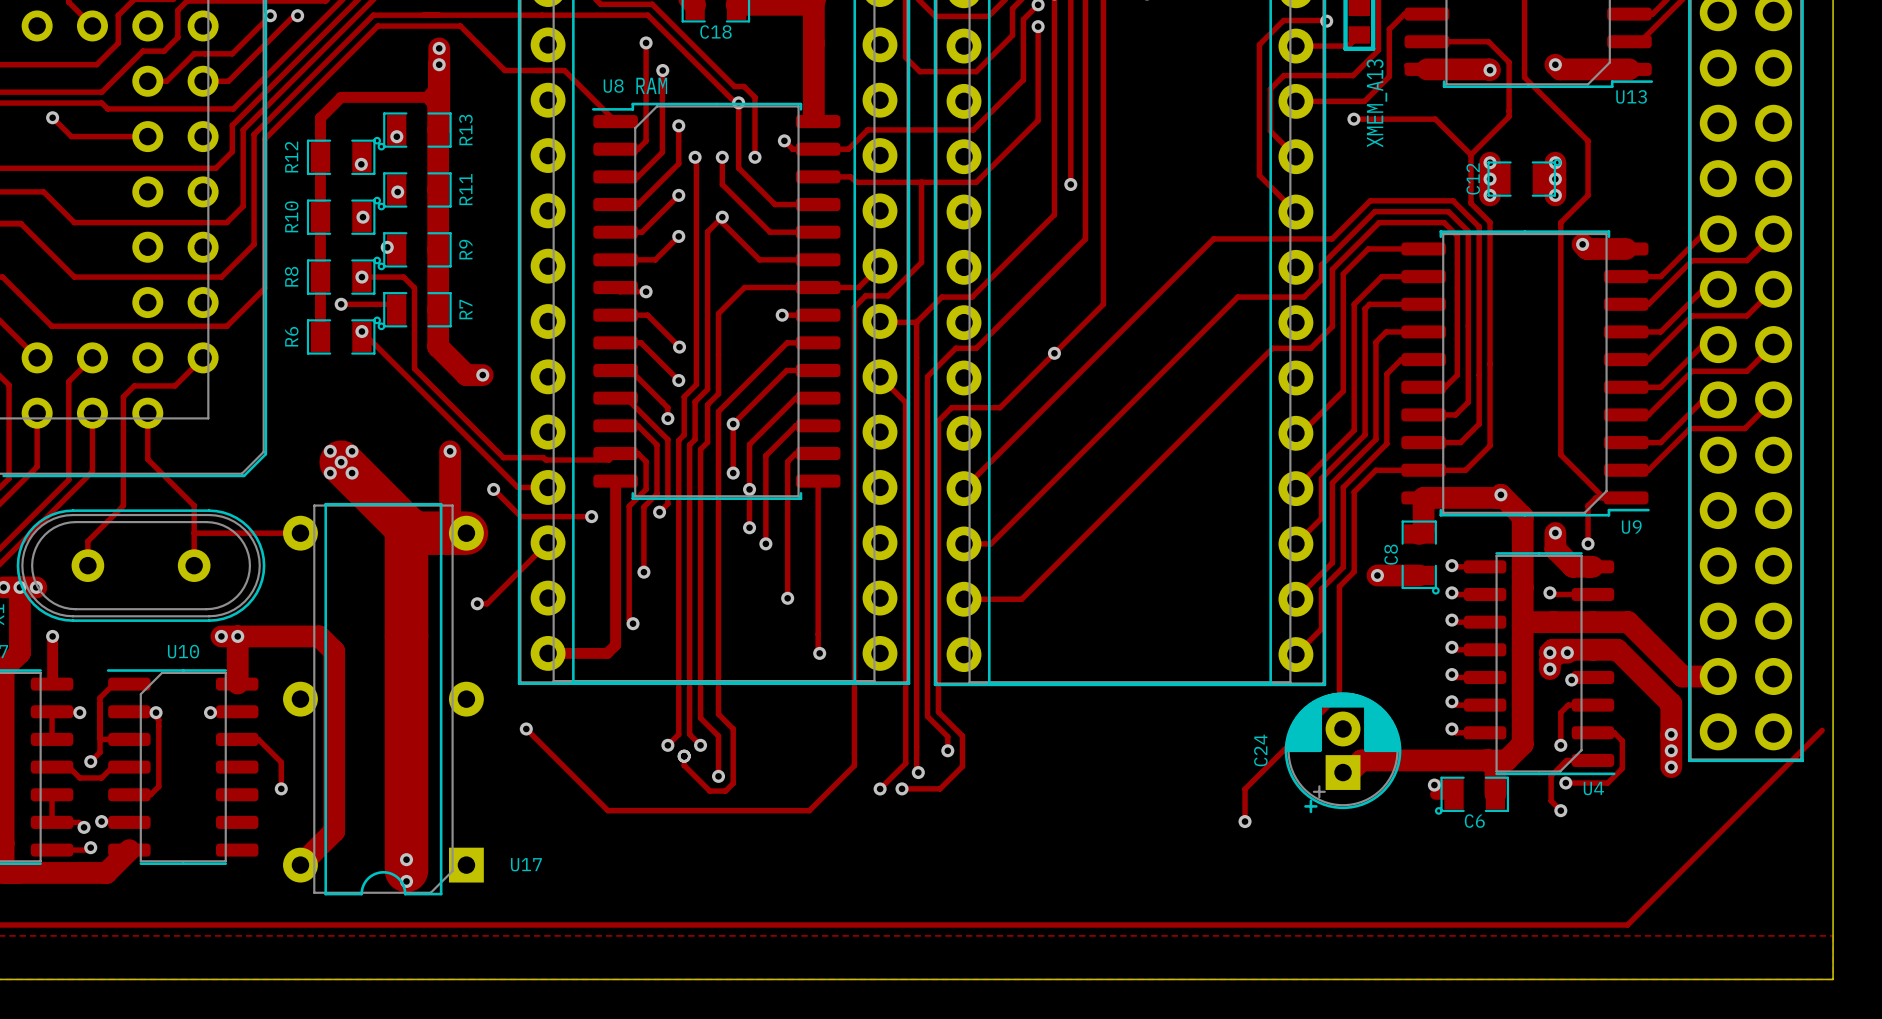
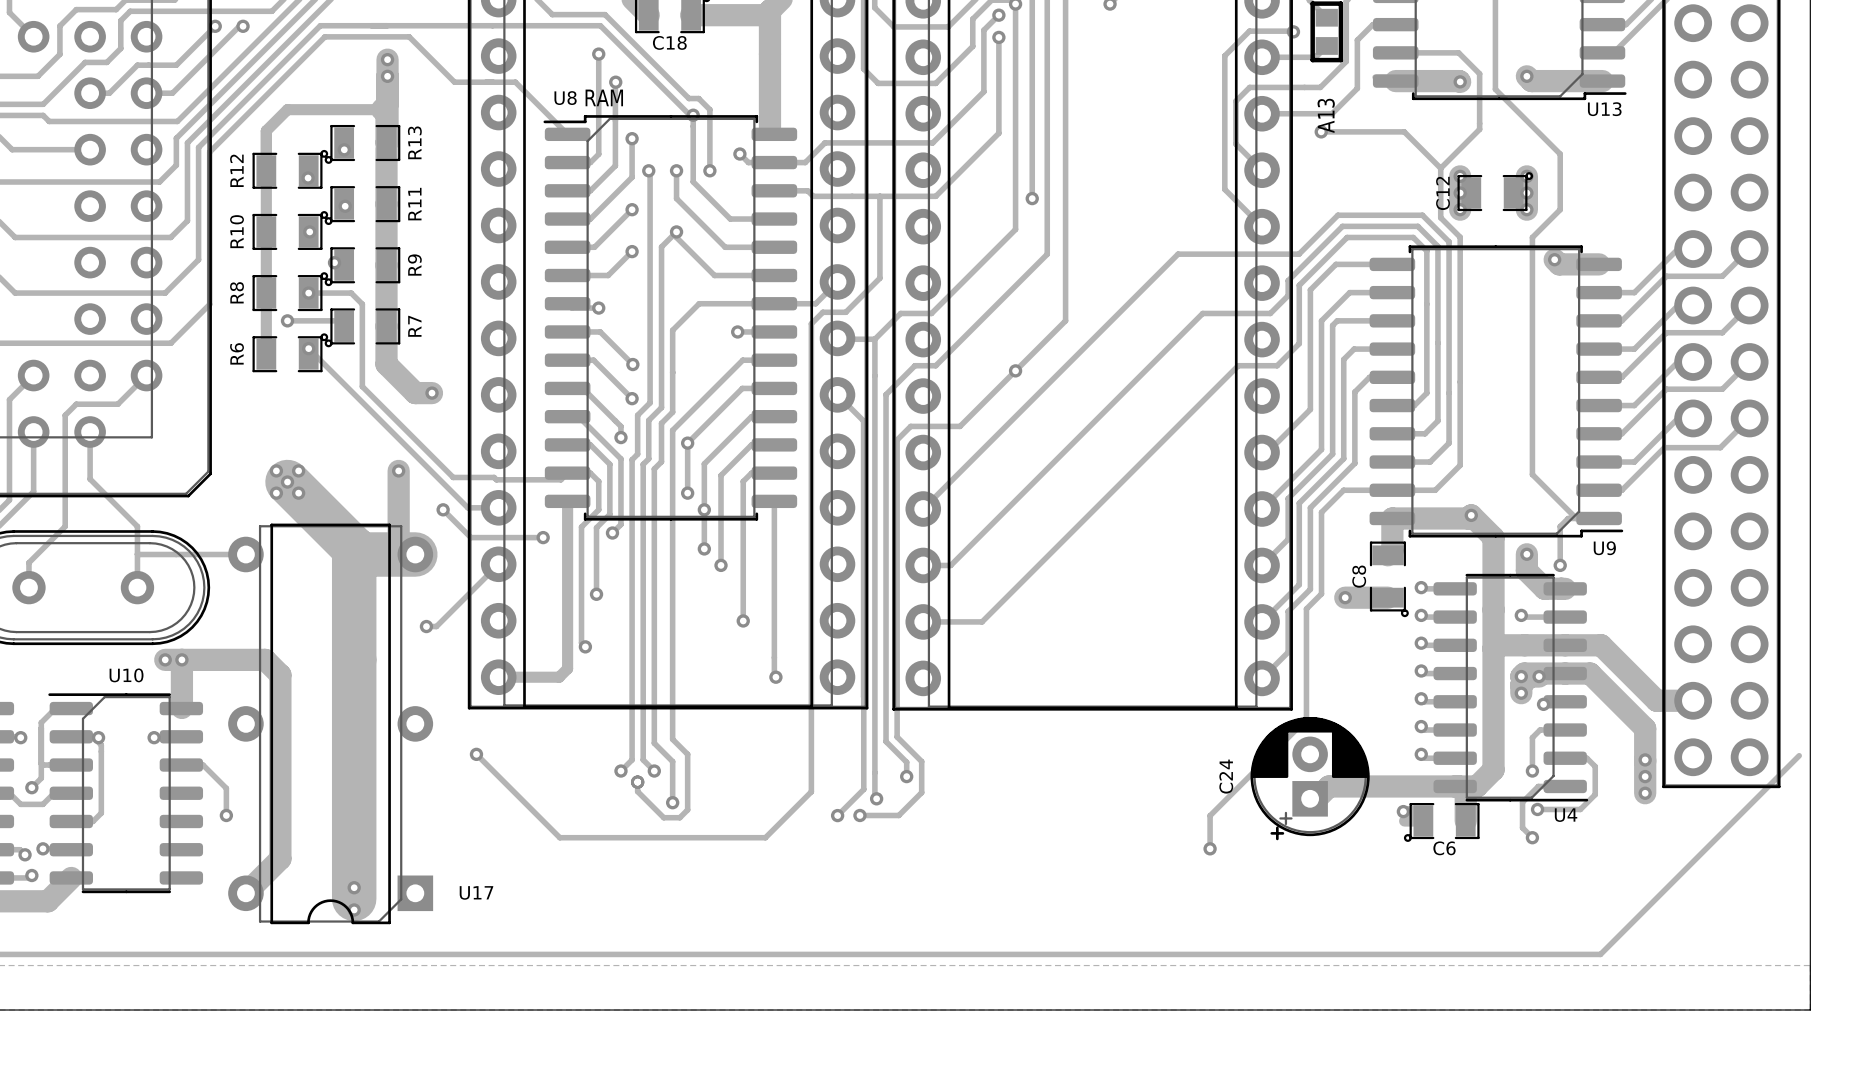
part value: XMEM_A13 (1376, 103) -> A13 (1326, 115)

